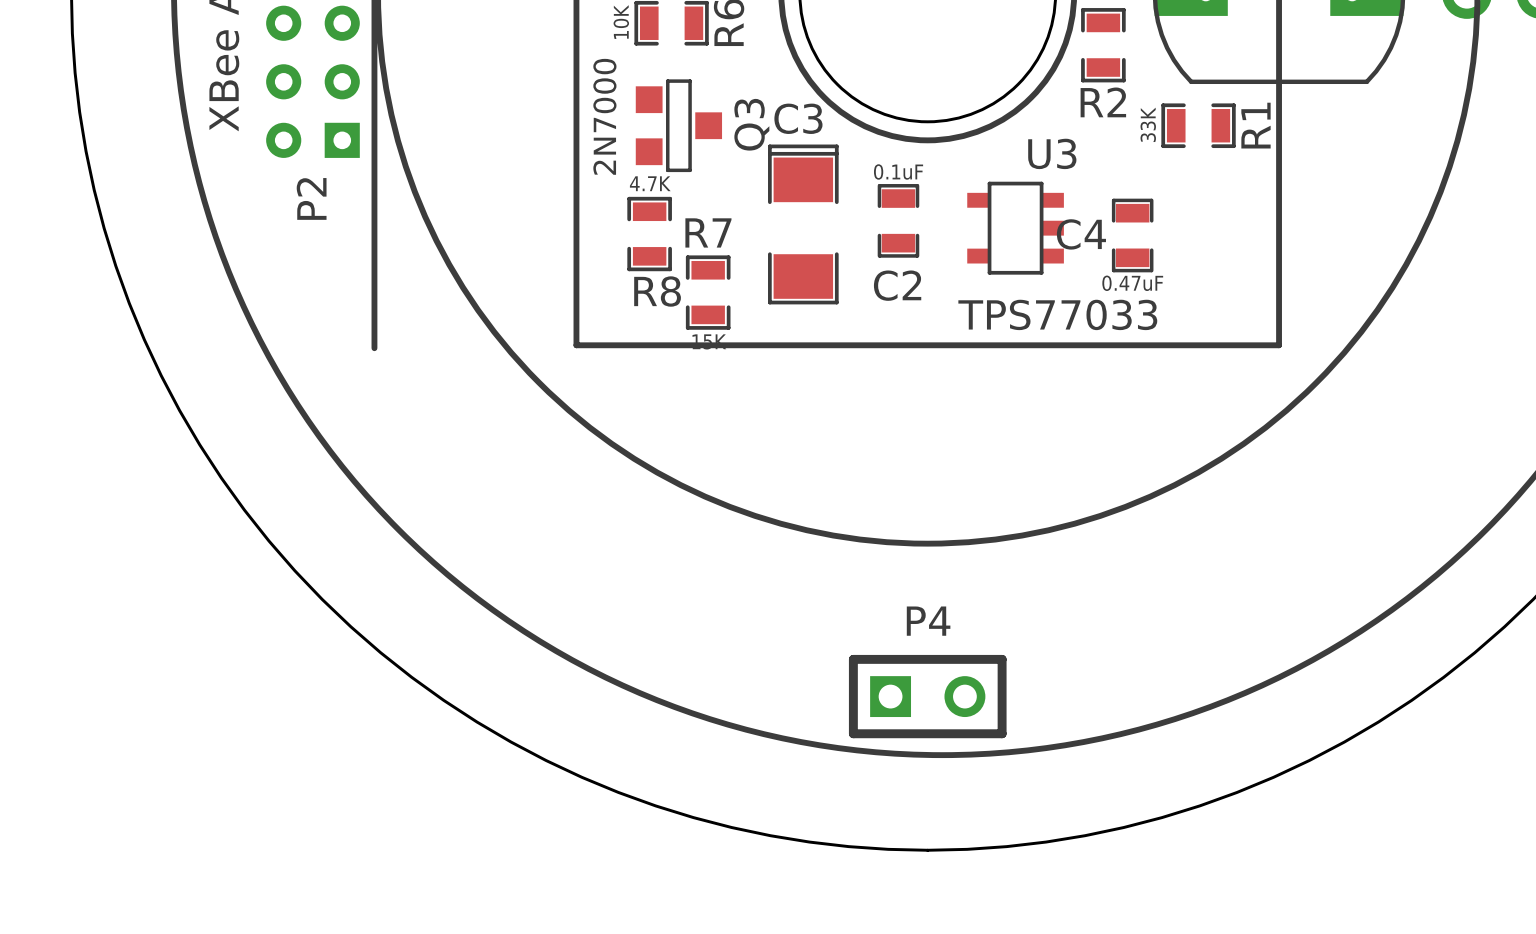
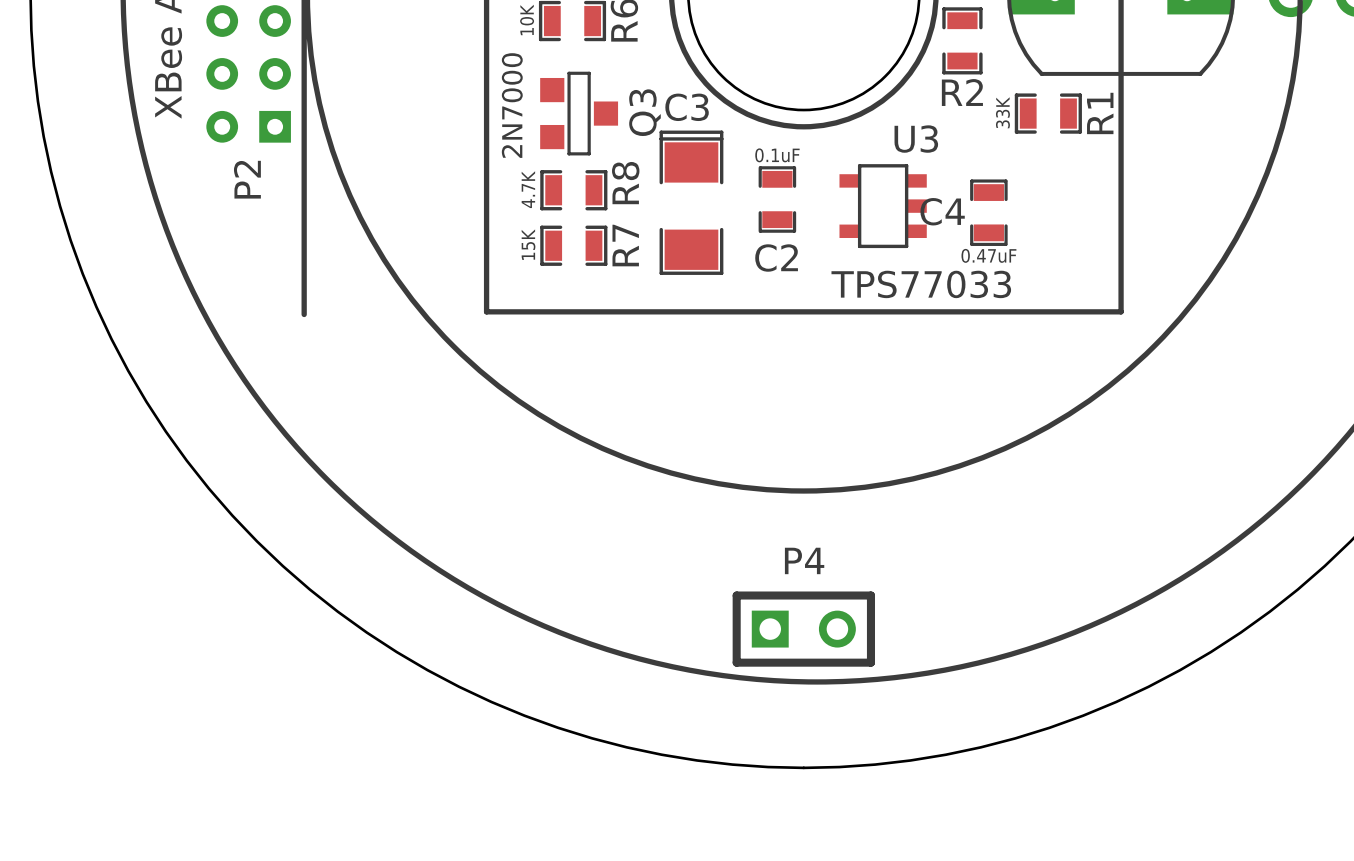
R8 value position: 4.7K (650, 183) -> 4.7K (528, 189)
R8 rotation: 0° (649, 234) -> 90° clockwise (573, 190)
R8 name position: R8 (657, 291) -> R8 (625, 183)
R7 rotation: 0° (708, 292) -> 90° clockwise (573, 245)

